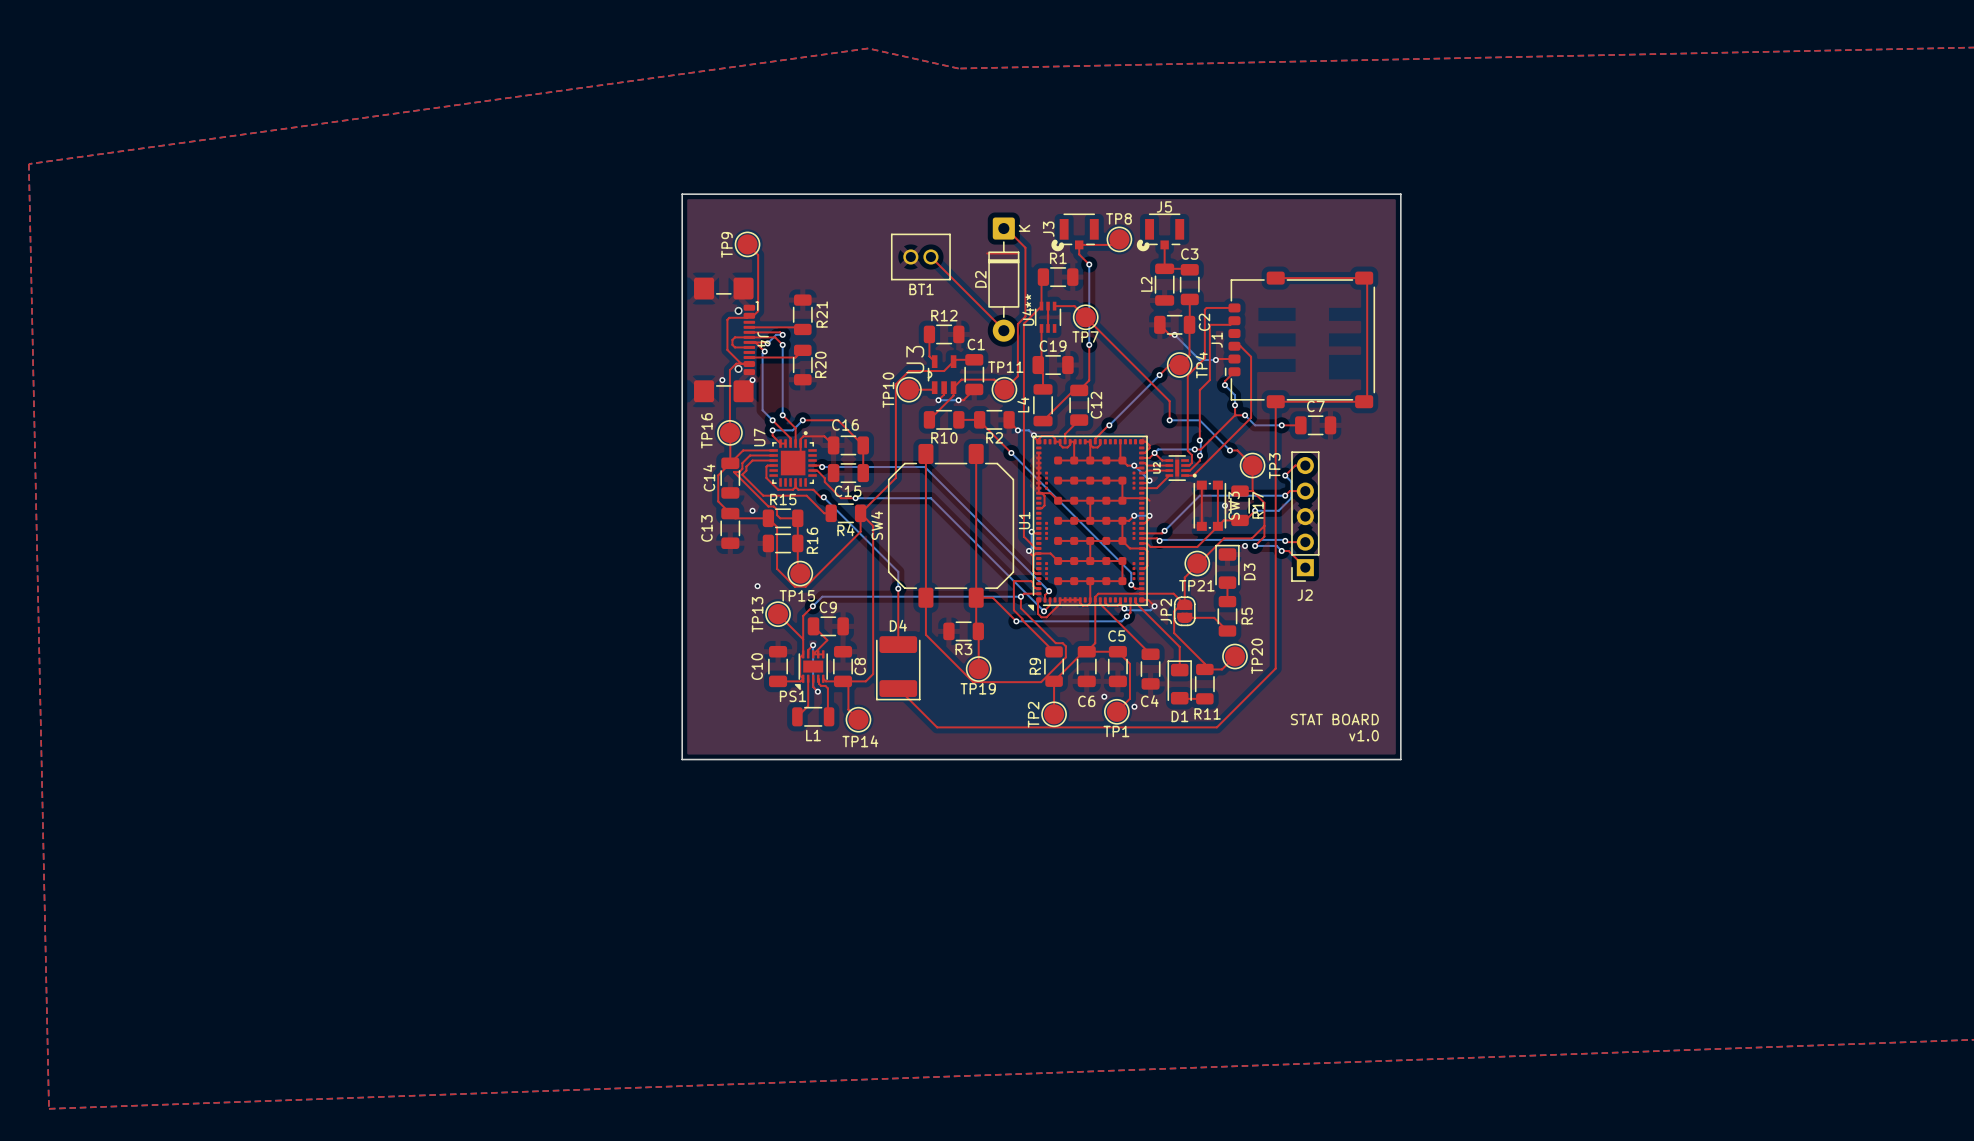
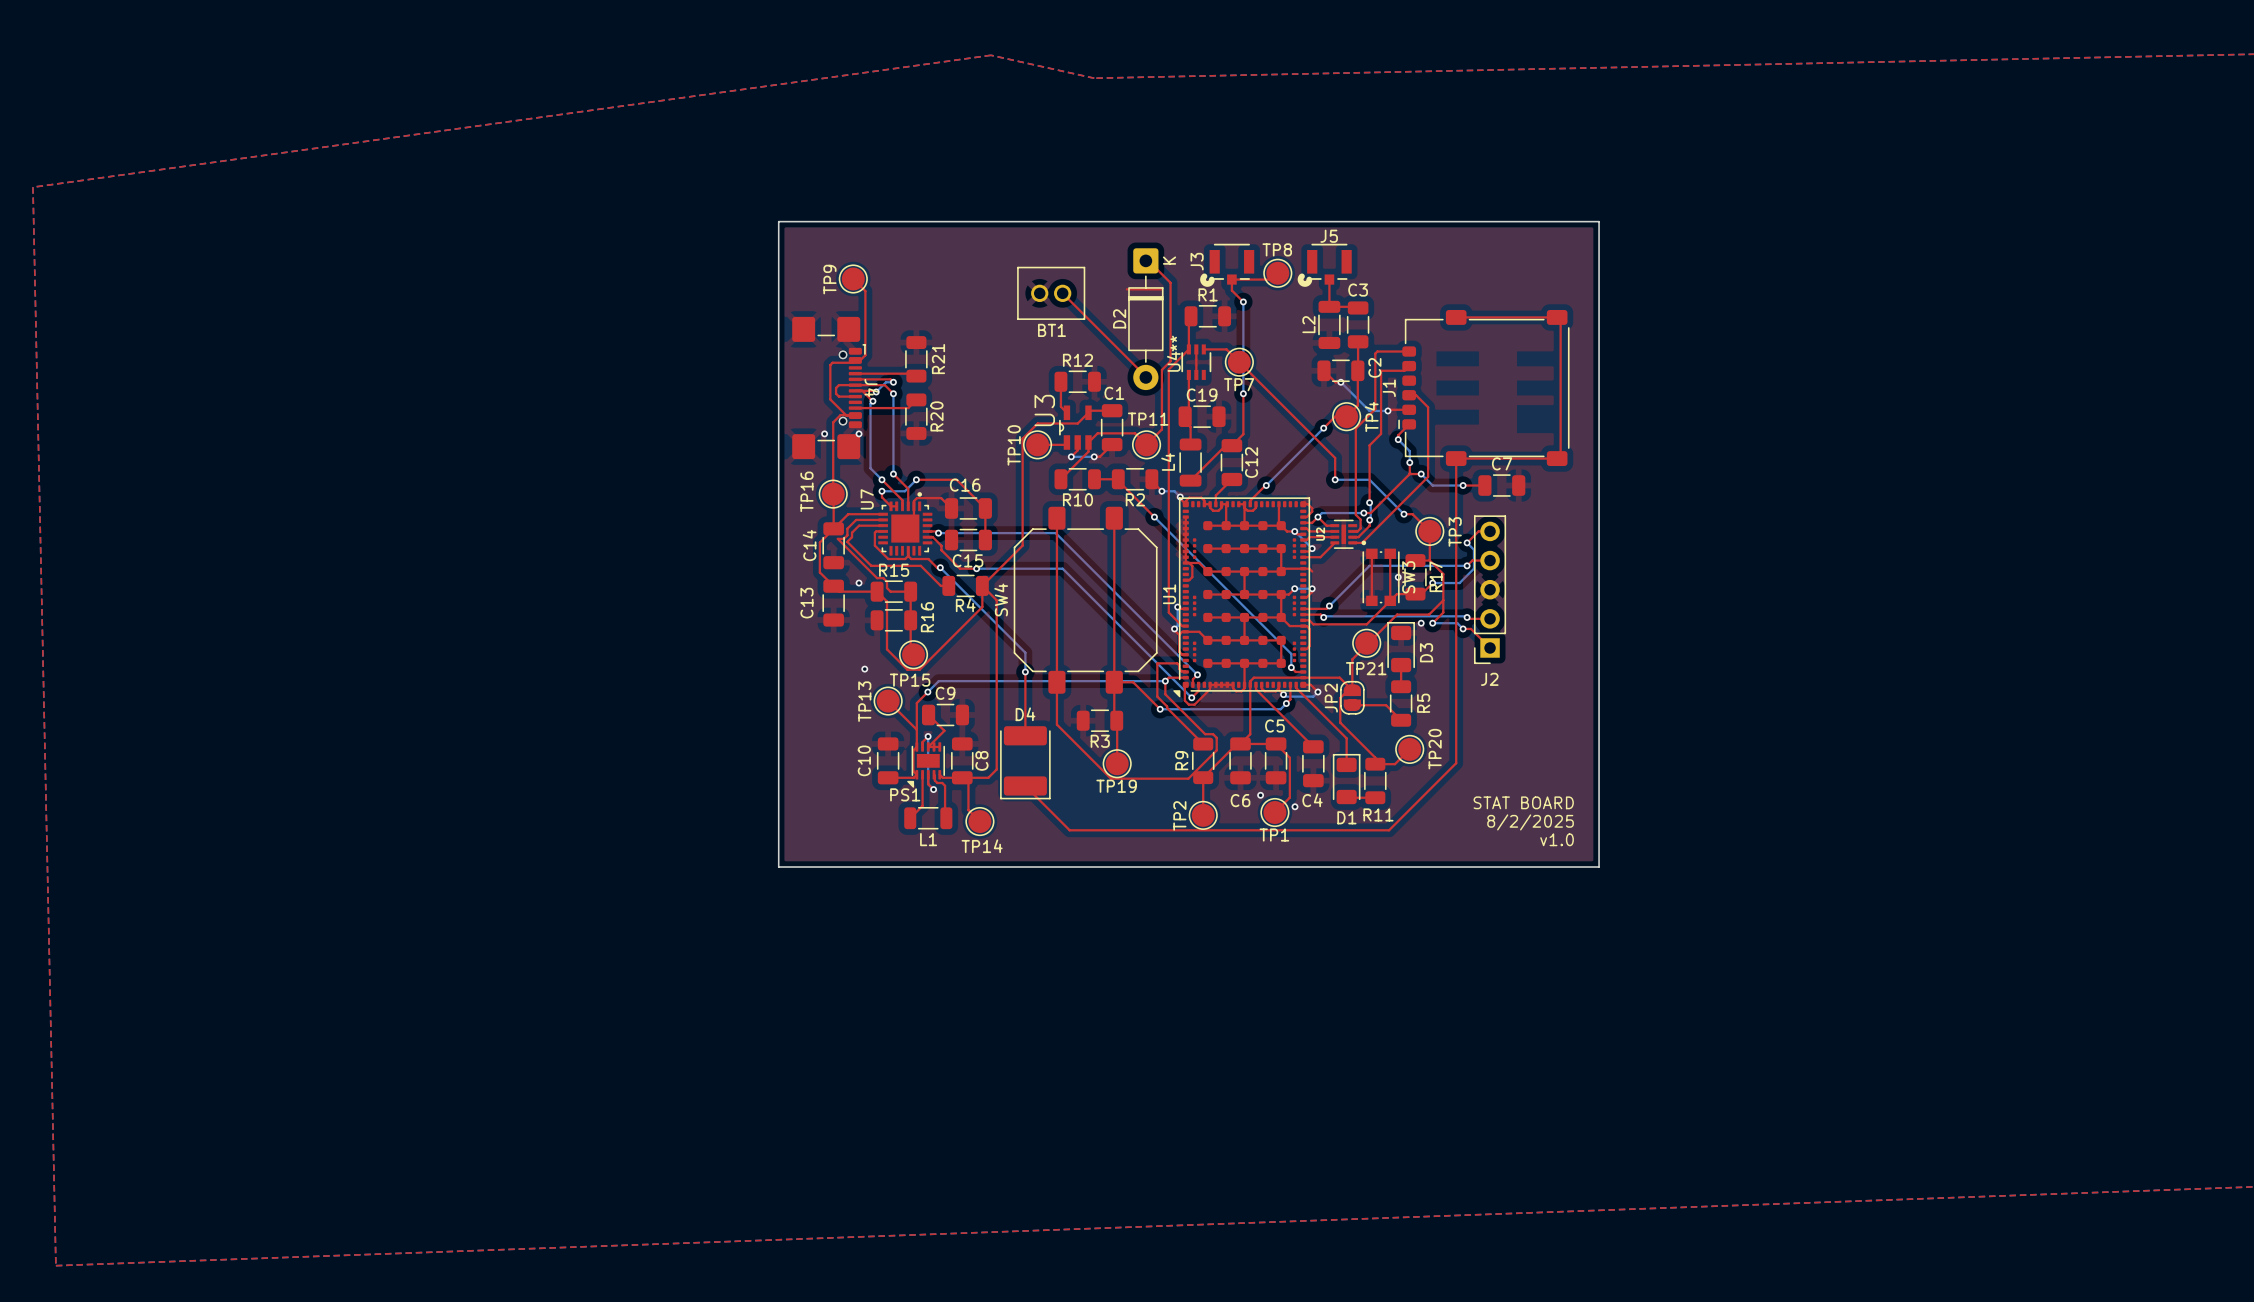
text: none -> STAT BOARD (1523, 802)
text: STAT BOARD (1334, 719) -> 8/2/2025 (1530, 822)

